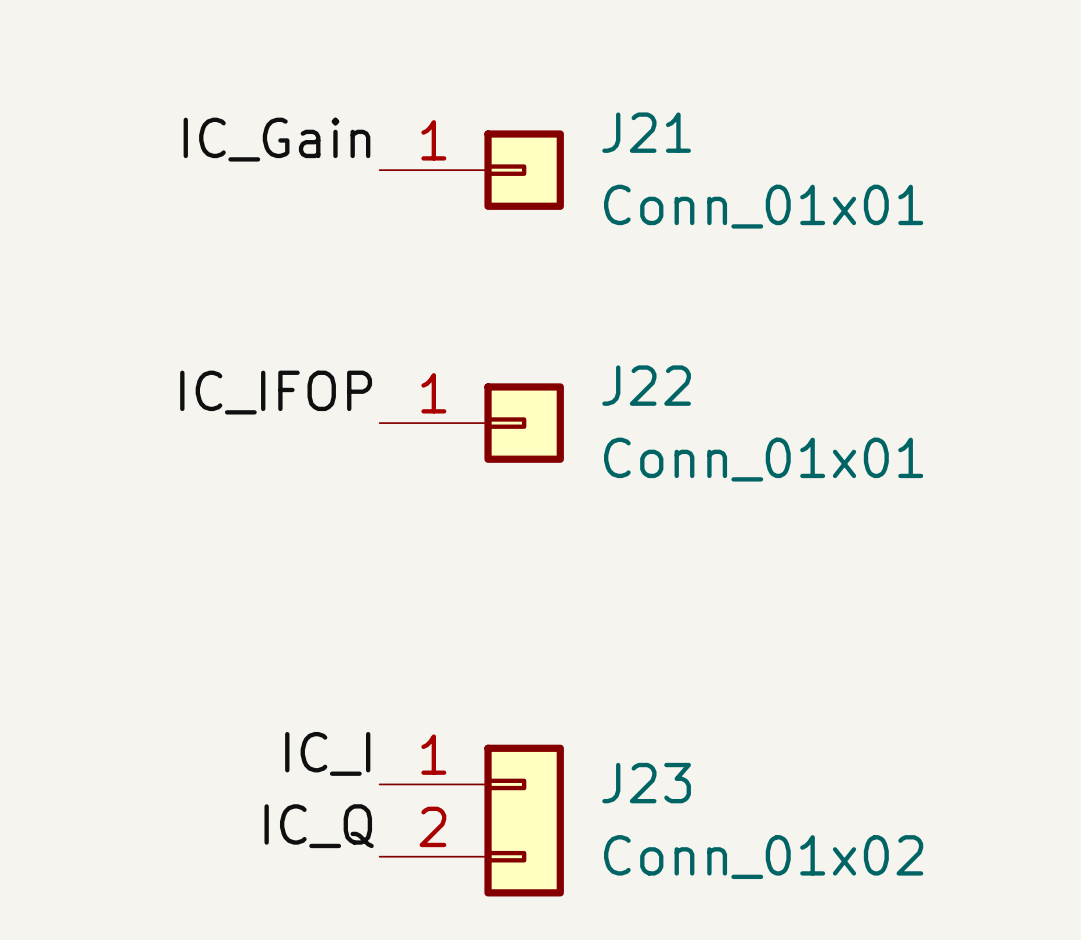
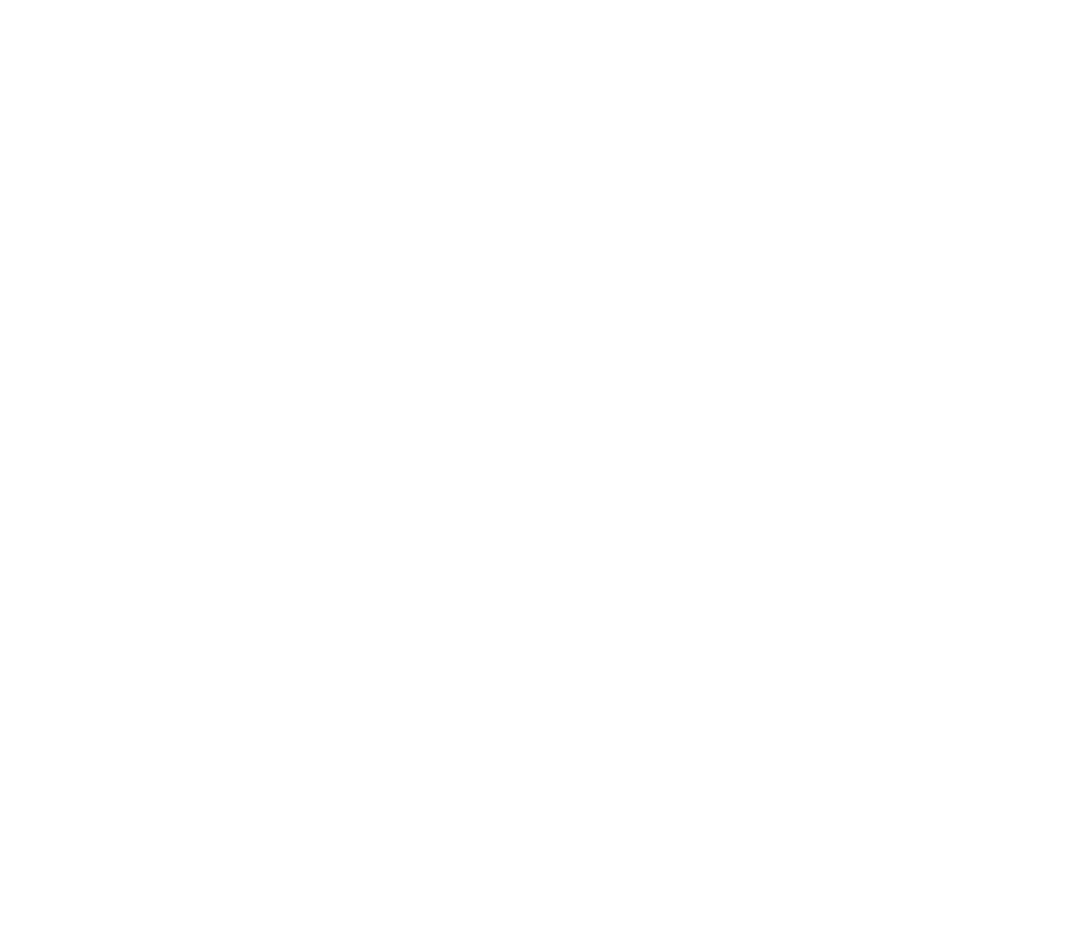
label: IC_Gain (276, 139) -> none
J21: Conn_01x01 (471, 170) -> none
label: IC_IFOP (276, 392) -> none
J22: Conn_01x01 (471, 423) -> none
label: IC_I (327, 753) -> none
J23: Conn_01x02 (471, 820) -> none
label: IC_Q (319, 826) -> none

